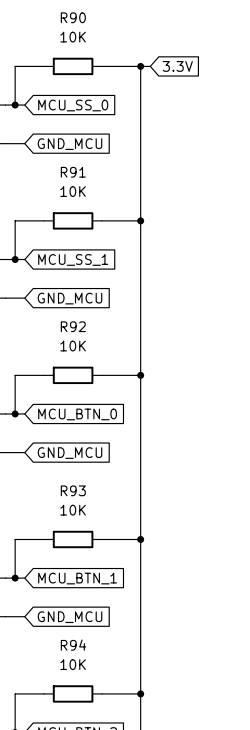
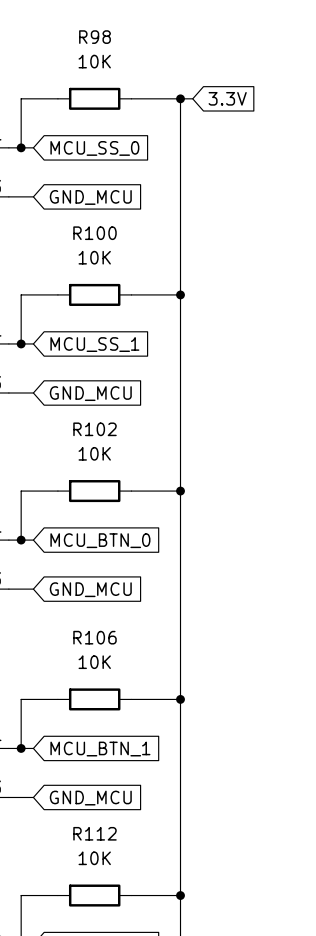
R90 name: R90 (73, 17) -> R98 (95, 37)
R91 name: R91 (73, 172) -> R100 (95, 233)
R92 name: R92 (73, 326) -> R102 (95, 429)
R93 name: R93 (73, 490) -> R106 (95, 637)
R94 name: R94 (73, 645) -> R112 (95, 833)

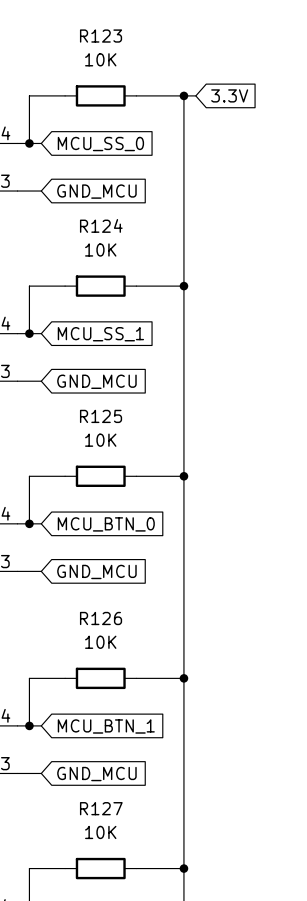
R98 name: R98 (95, 37) -> R123 (101, 36)
R100 name: R100 (95, 233) -> R124 (101, 225)
R102 name: R102 (95, 429) -> R125 (101, 416)
R106 name: R106 (95, 637) -> R126 (101, 618)
R112 name: R112 (95, 833) -> R127 (101, 808)

